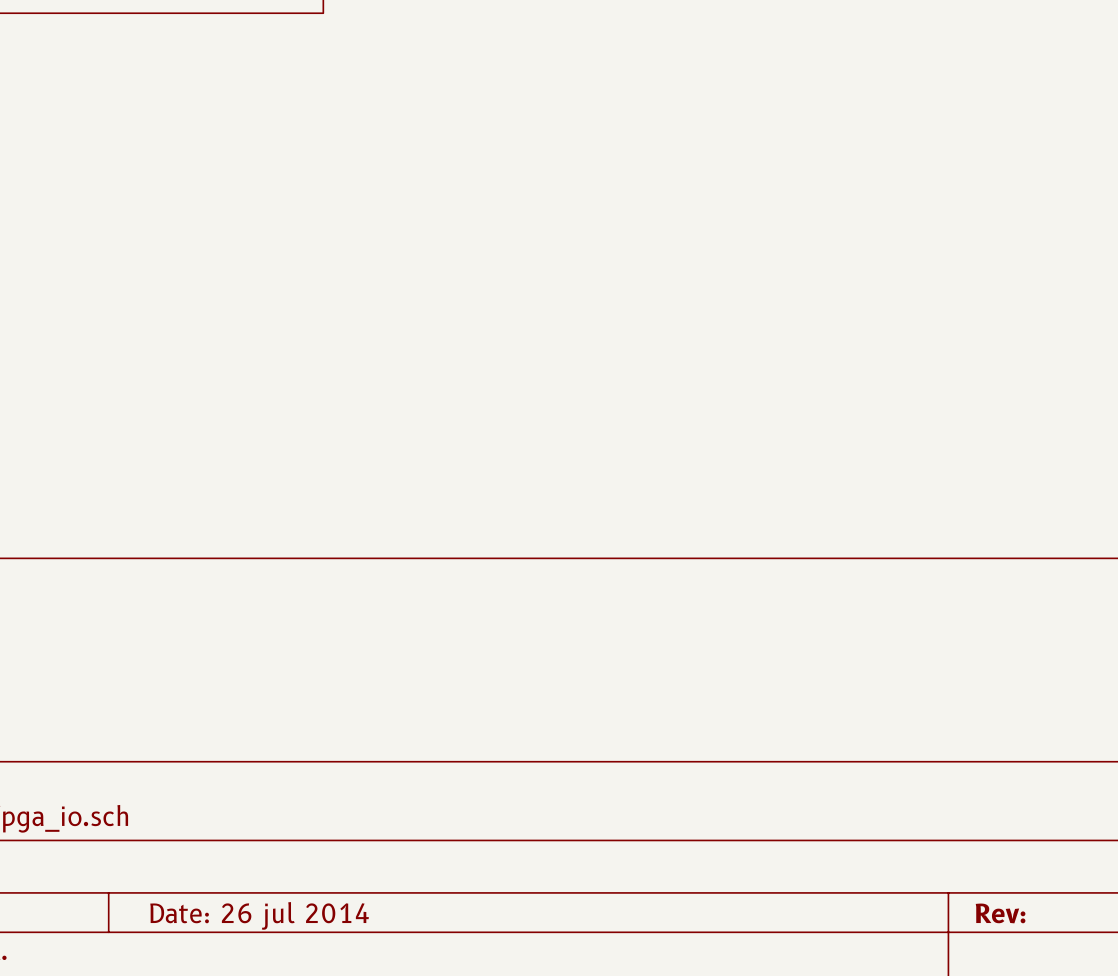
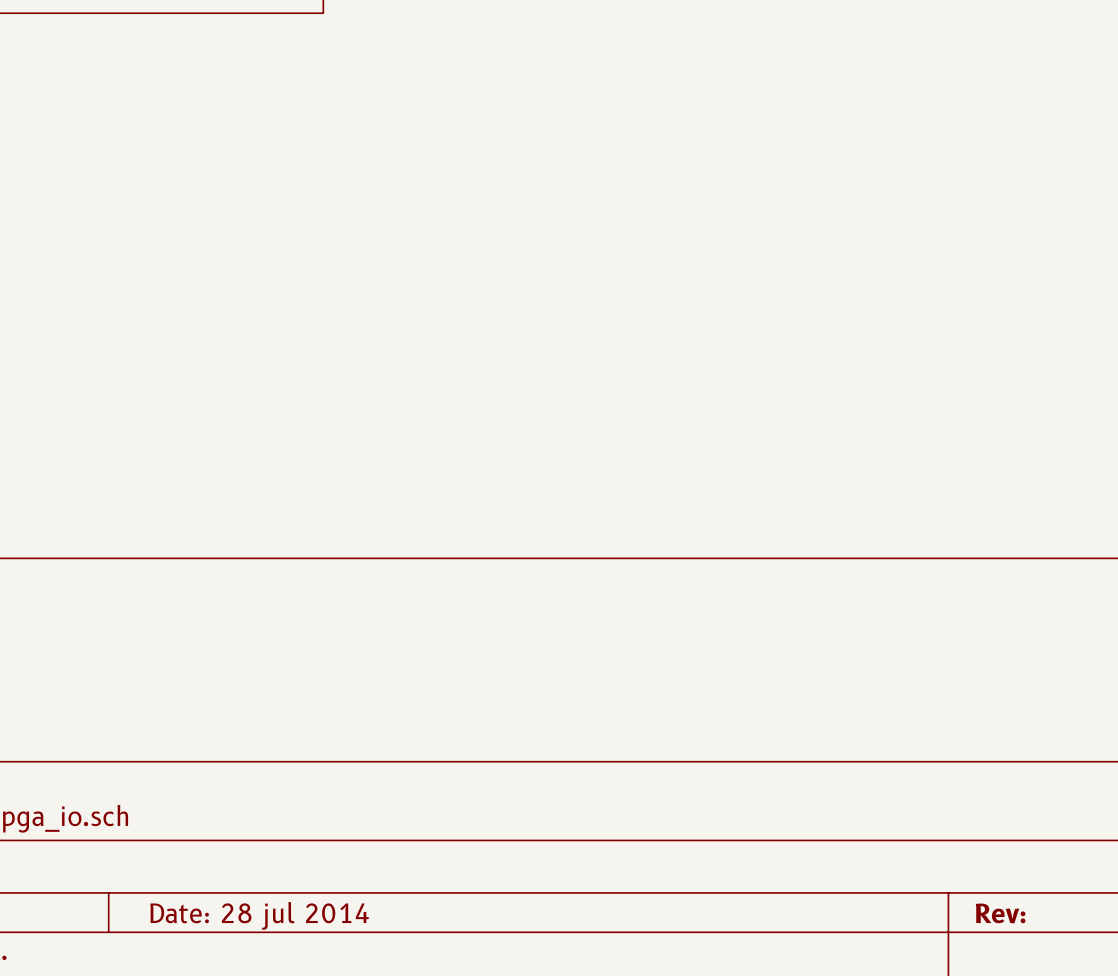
title block: Date: 26 jul 2014 (259, 915) -> Date: 28 jul 2014 (259, 915)

